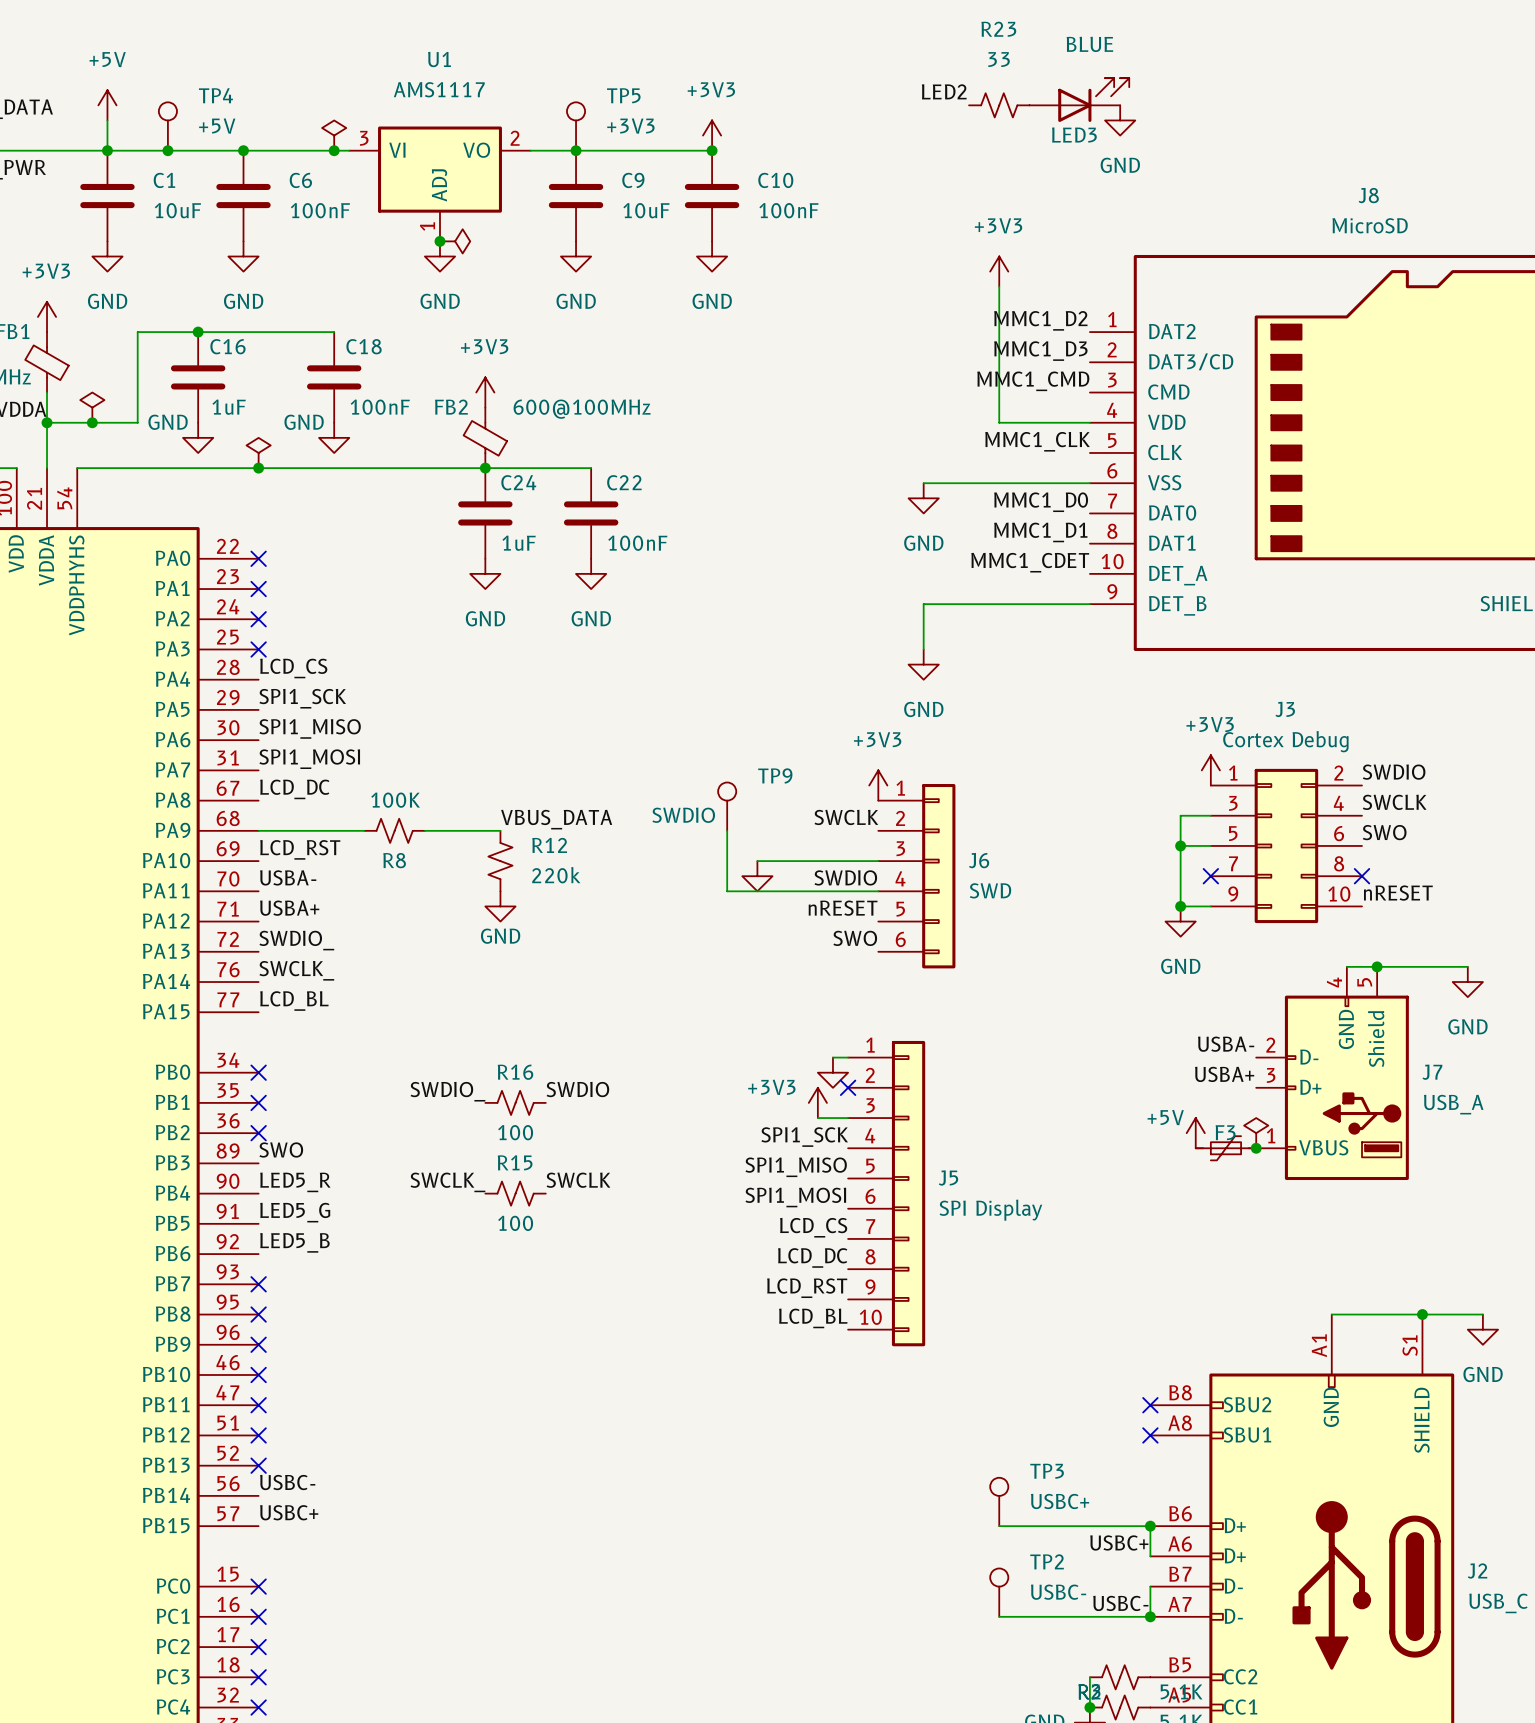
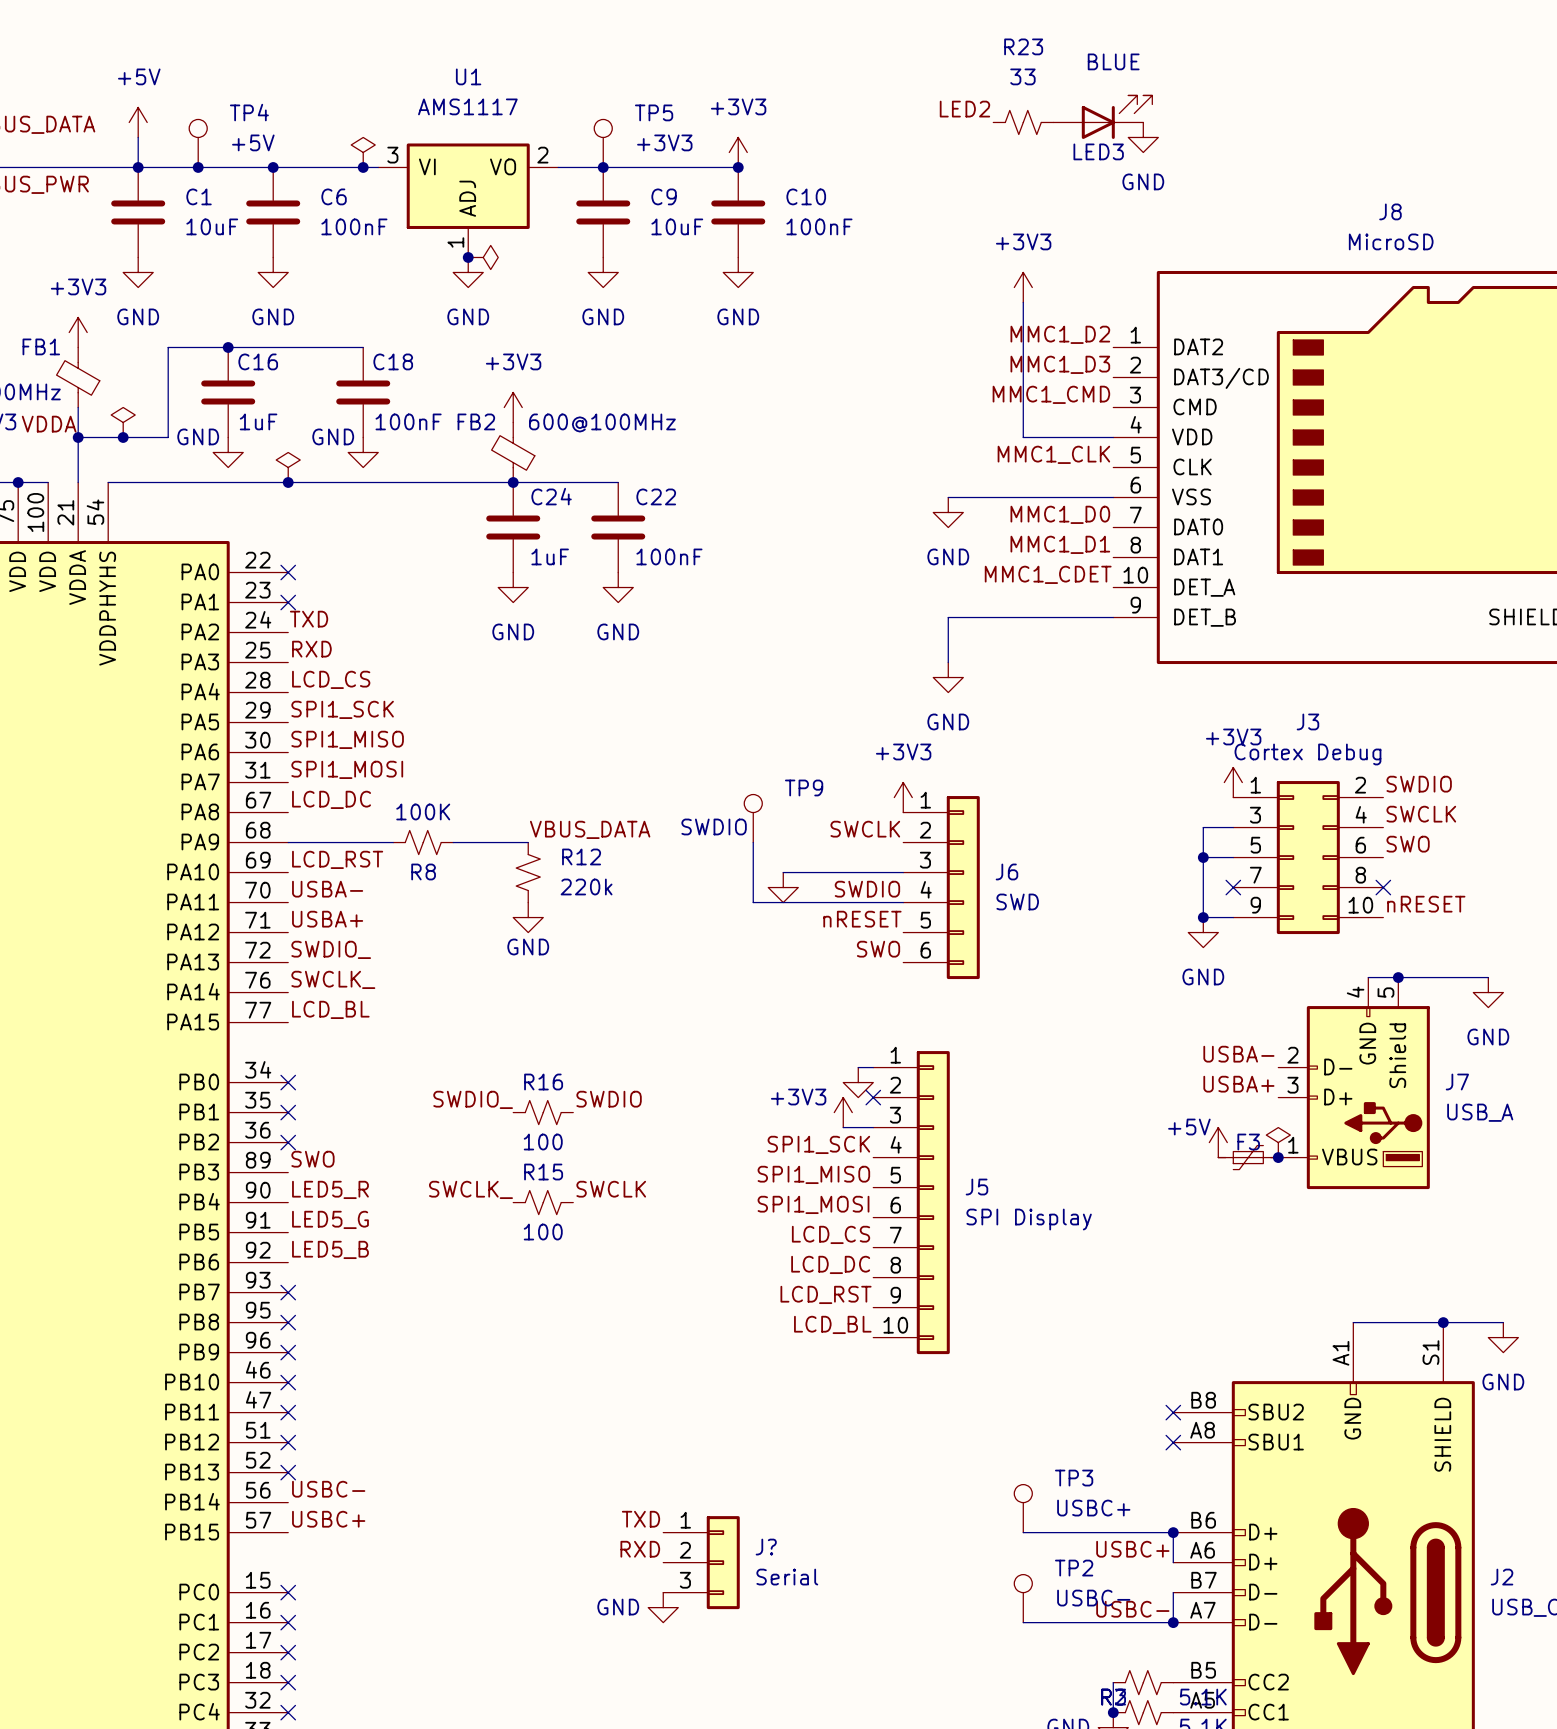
label: none -> TXD (309, 619)
no-connect mark: (258, 619) -> none
label: none -> RXD (311, 649)
no-connect mark: (258, 649) -> none
label: none -> TXD (641, 1519)
label: none -> RXD (640, 1549)
J?: none -> Serial (701, 1562)
power symbol: none -> GND (663, 1607)

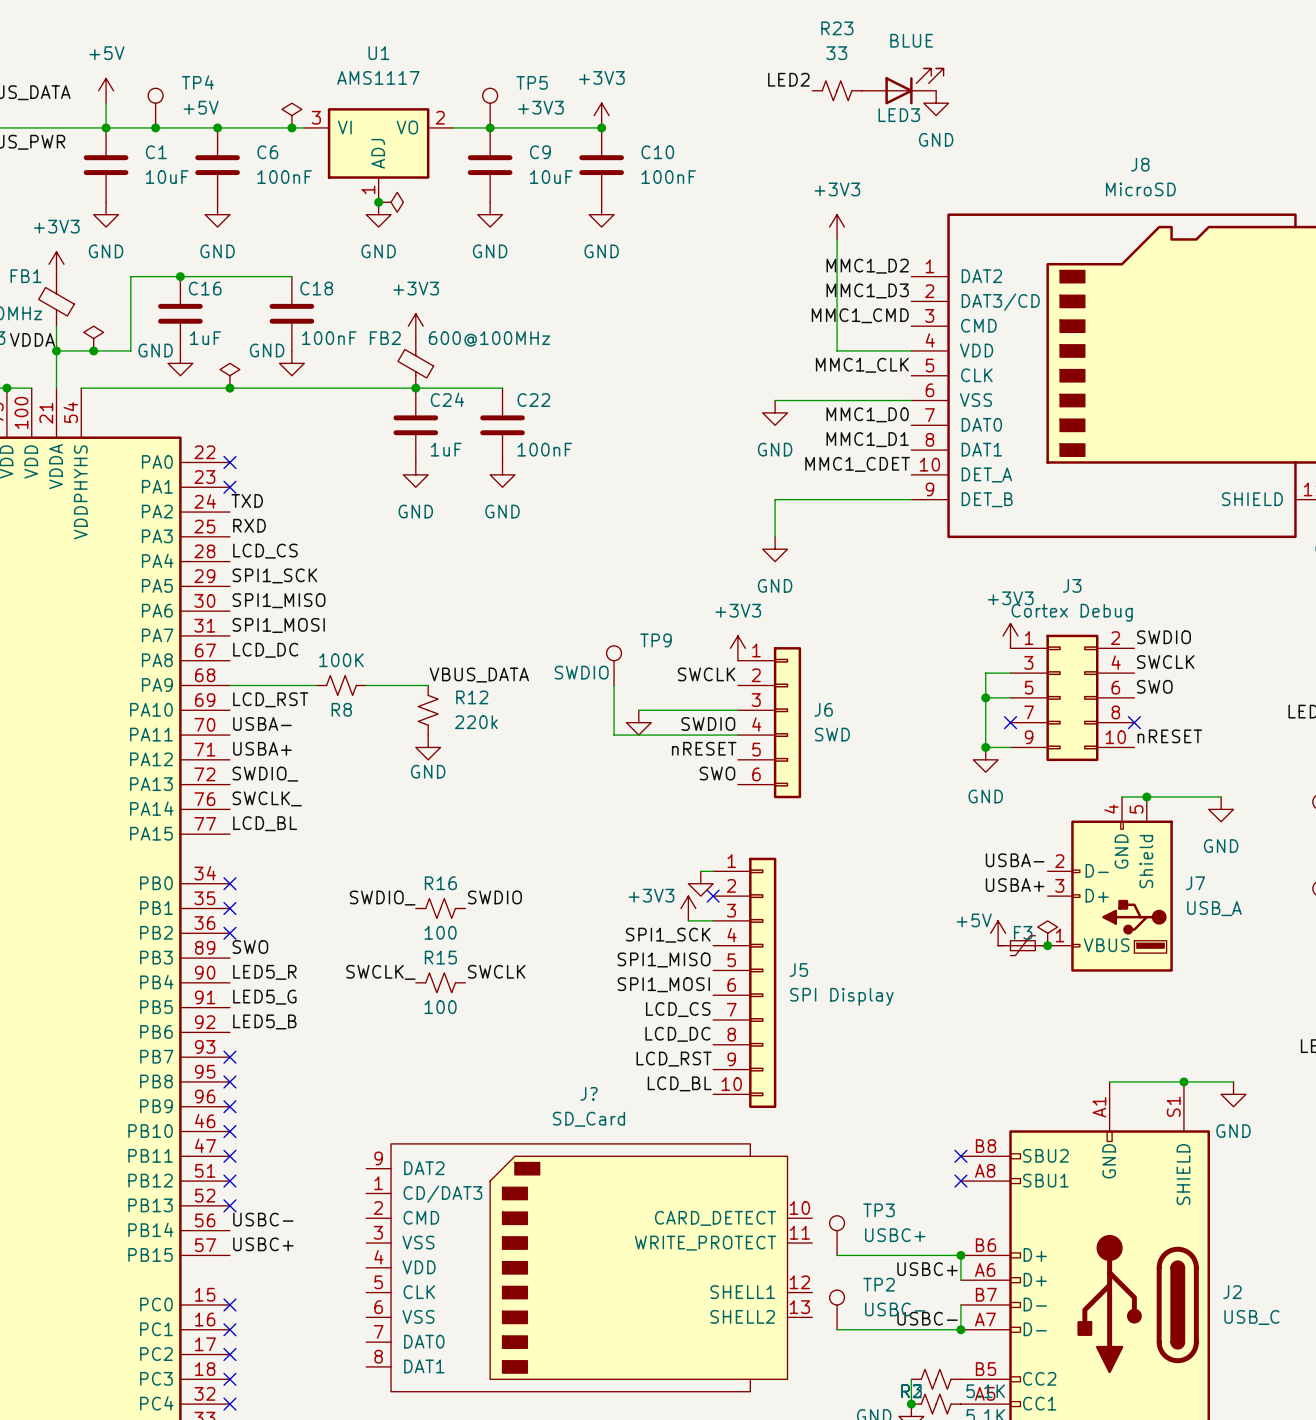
label: TXD (641, 1519) -> none
J?: none -> SD_Card (589, 1267)
label: RXD (640, 1549) -> none
J?: Serial (701, 1562) -> none
power symbol: GND (663, 1607) -> none

